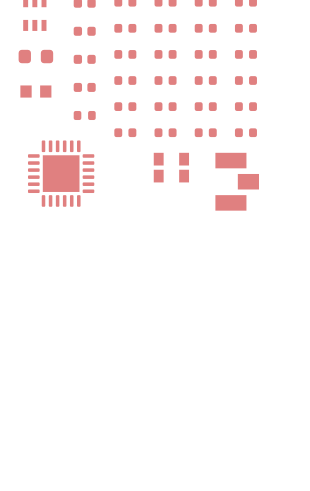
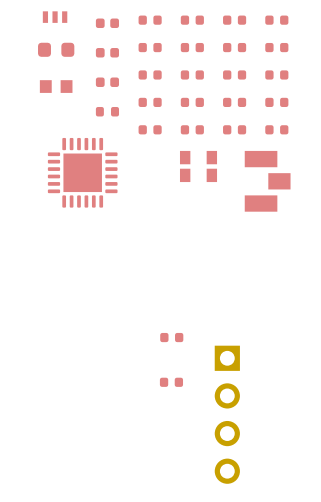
part: none -> (171, 337)
part: none -> (171, 382)
part: none -> (227, 414)

